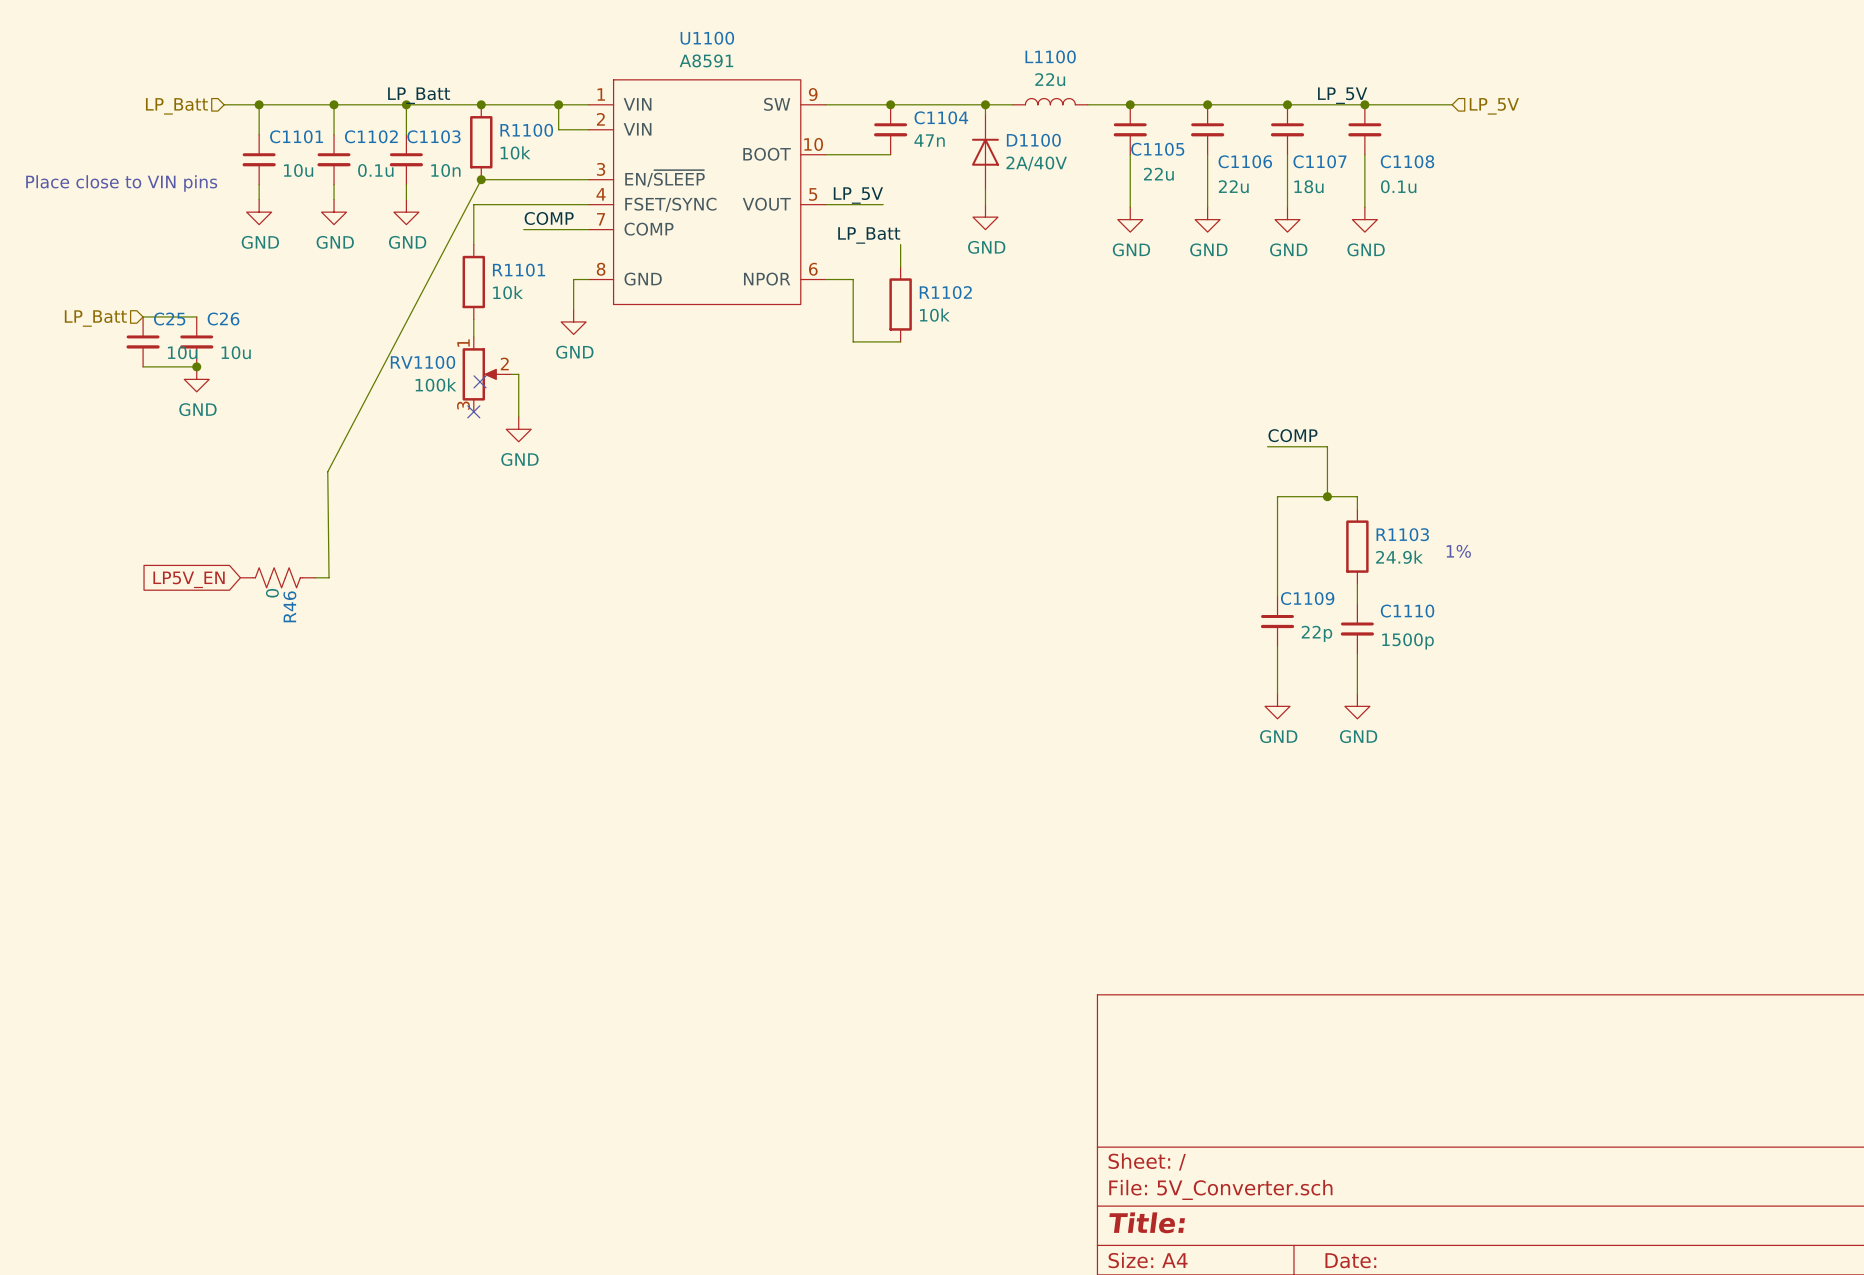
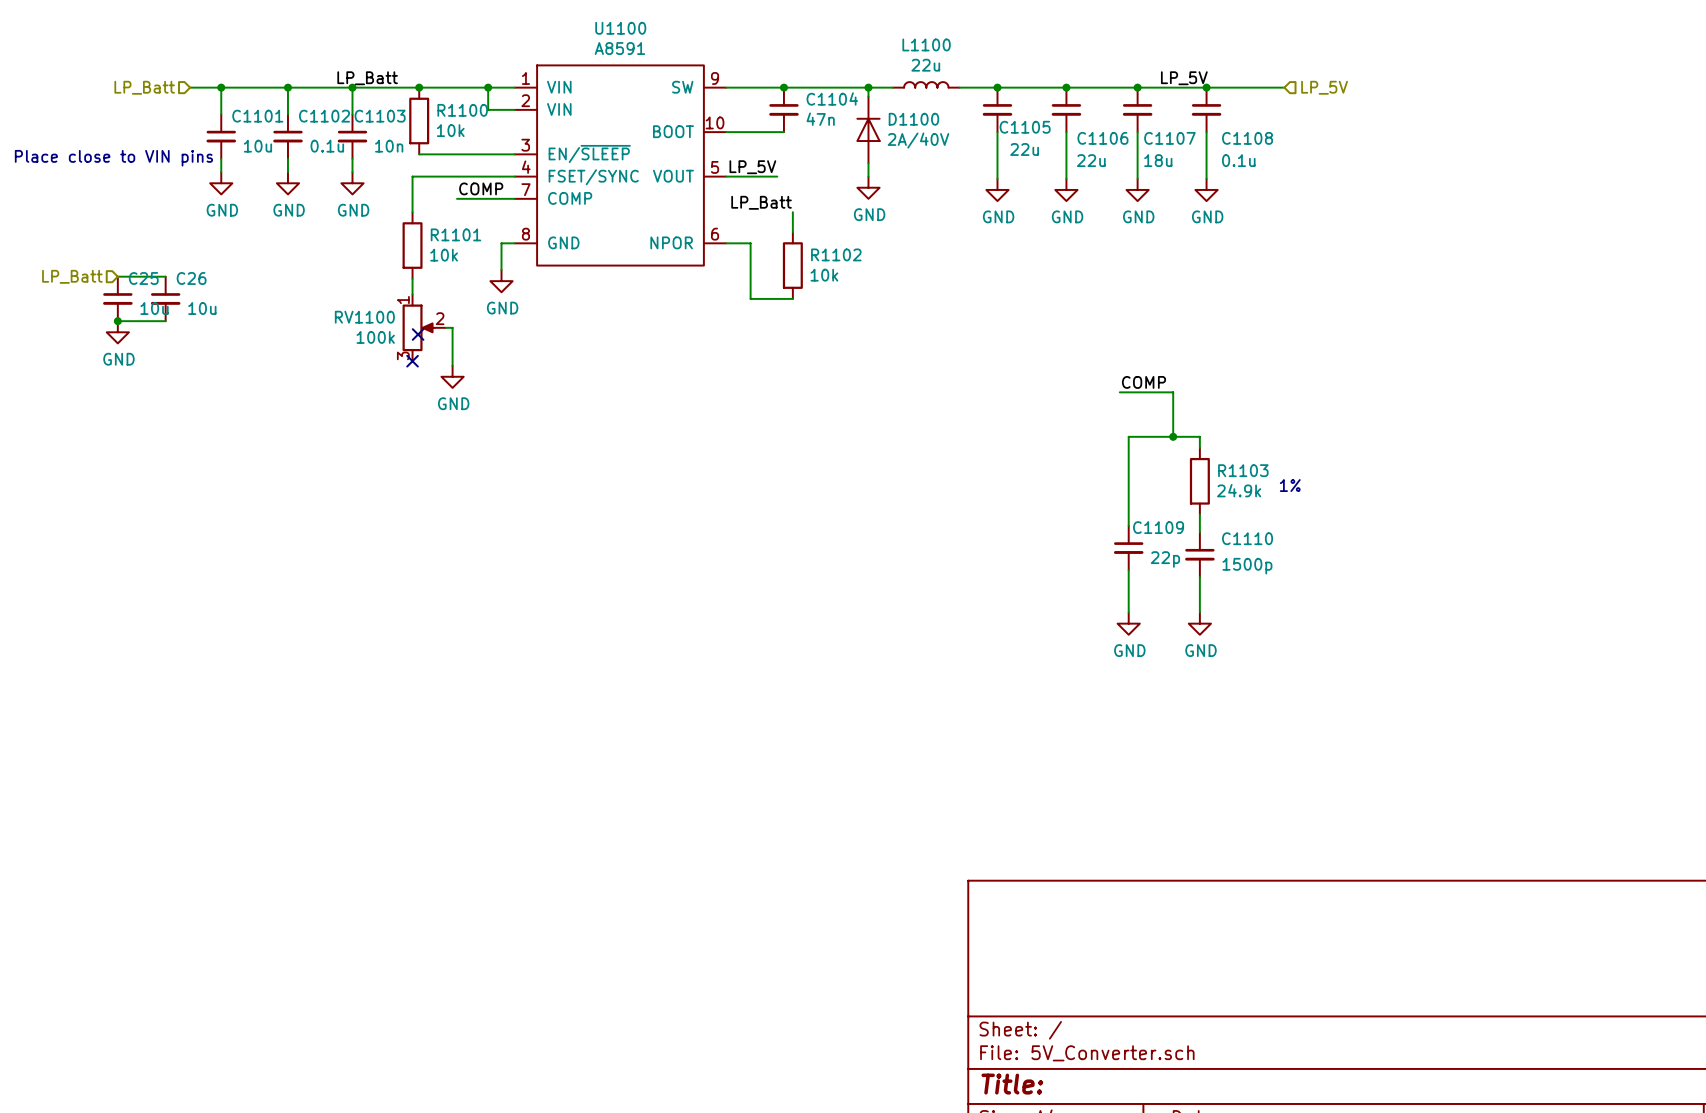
wire: (481, 179) (327, 471) (329, 577) (315, 577) -> none
junction: (481, 179) -> none
junction position: (196, 366) -> (117, 321)
power symbol position: GND (196, 379) -> GND (117, 332)
R46: 0 (277, 577) -> none
global label: LP5V_EN (189, 579) -> none

